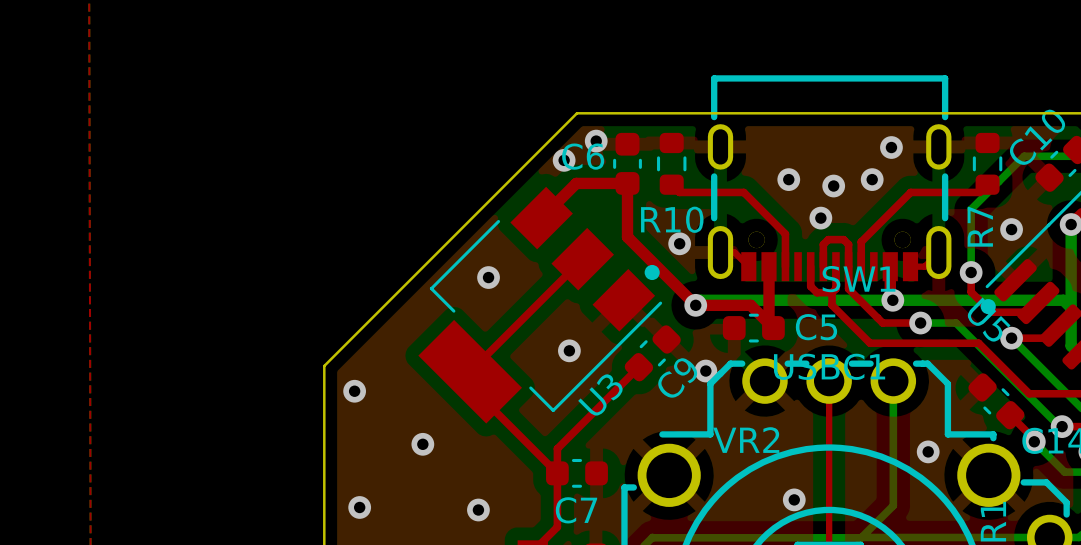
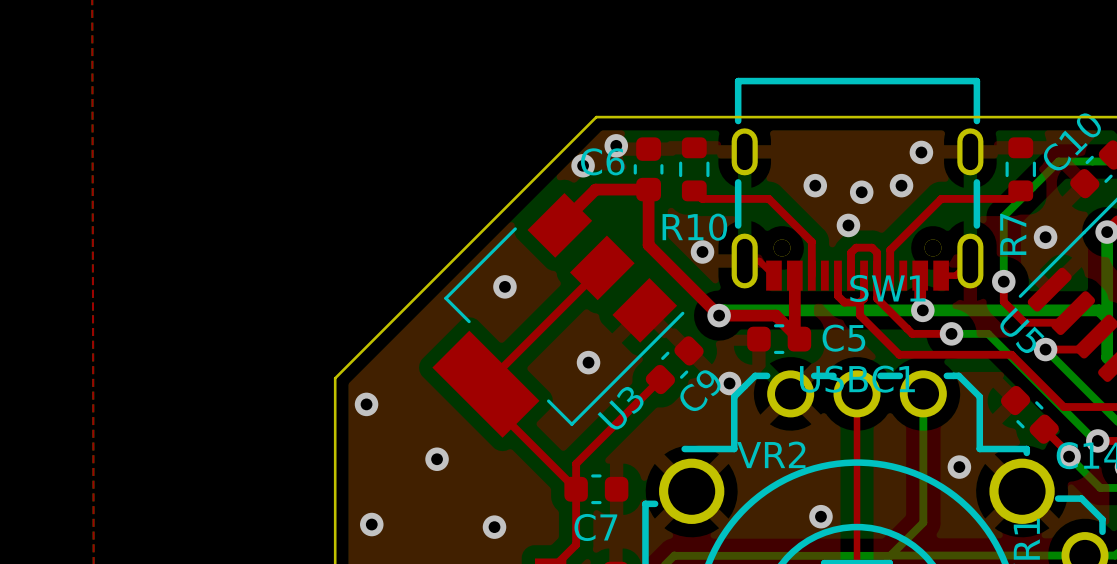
drawing: [644, 264, 660, 281] -> none
drawing: [980, 299, 996, 315] -> none

